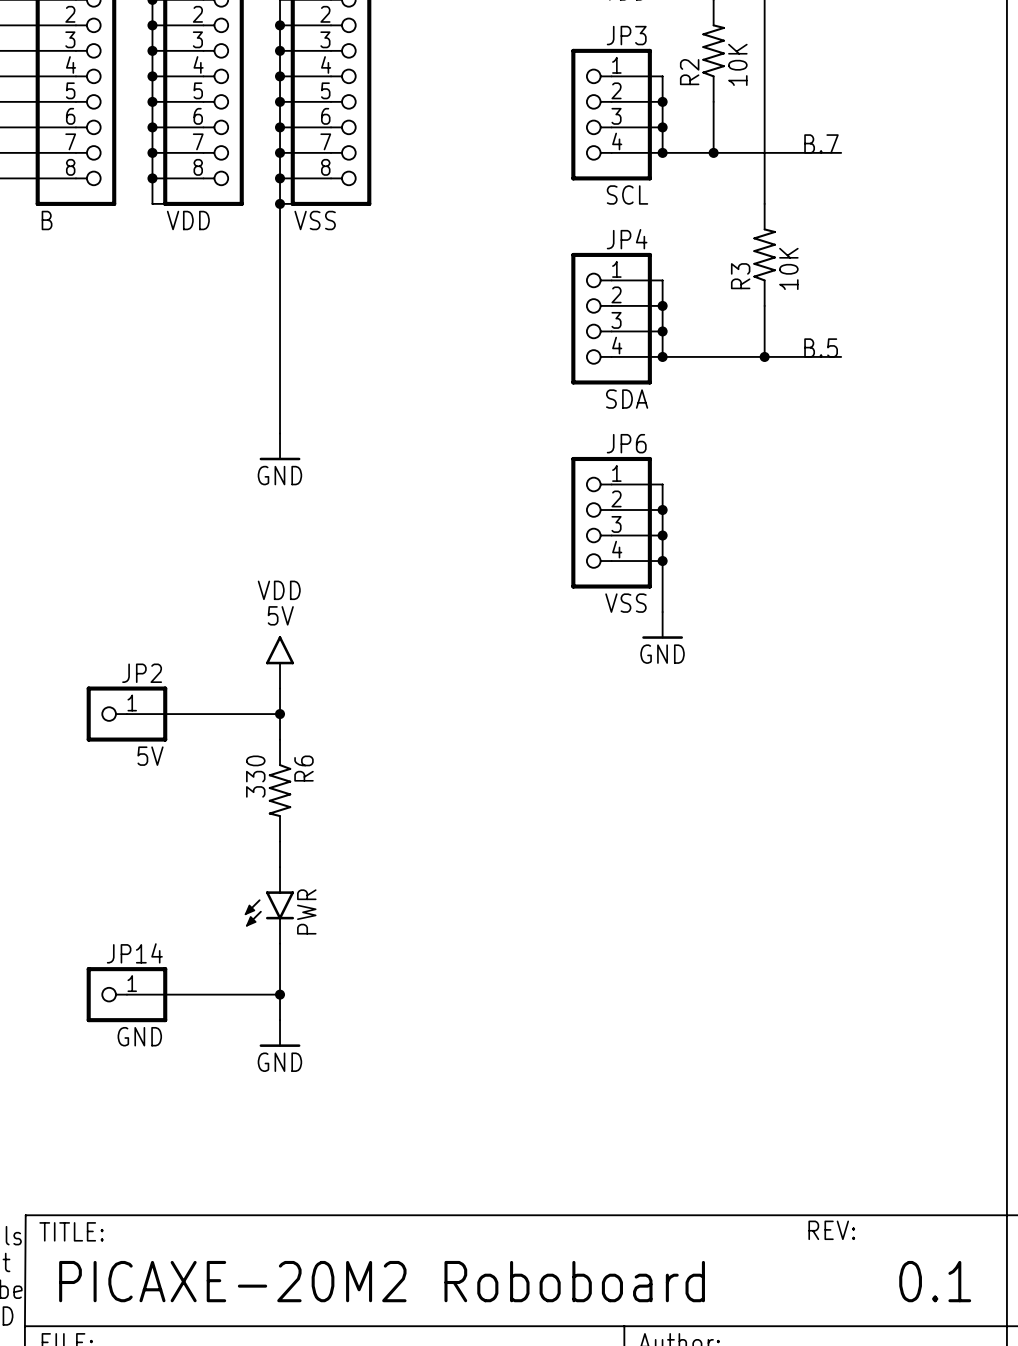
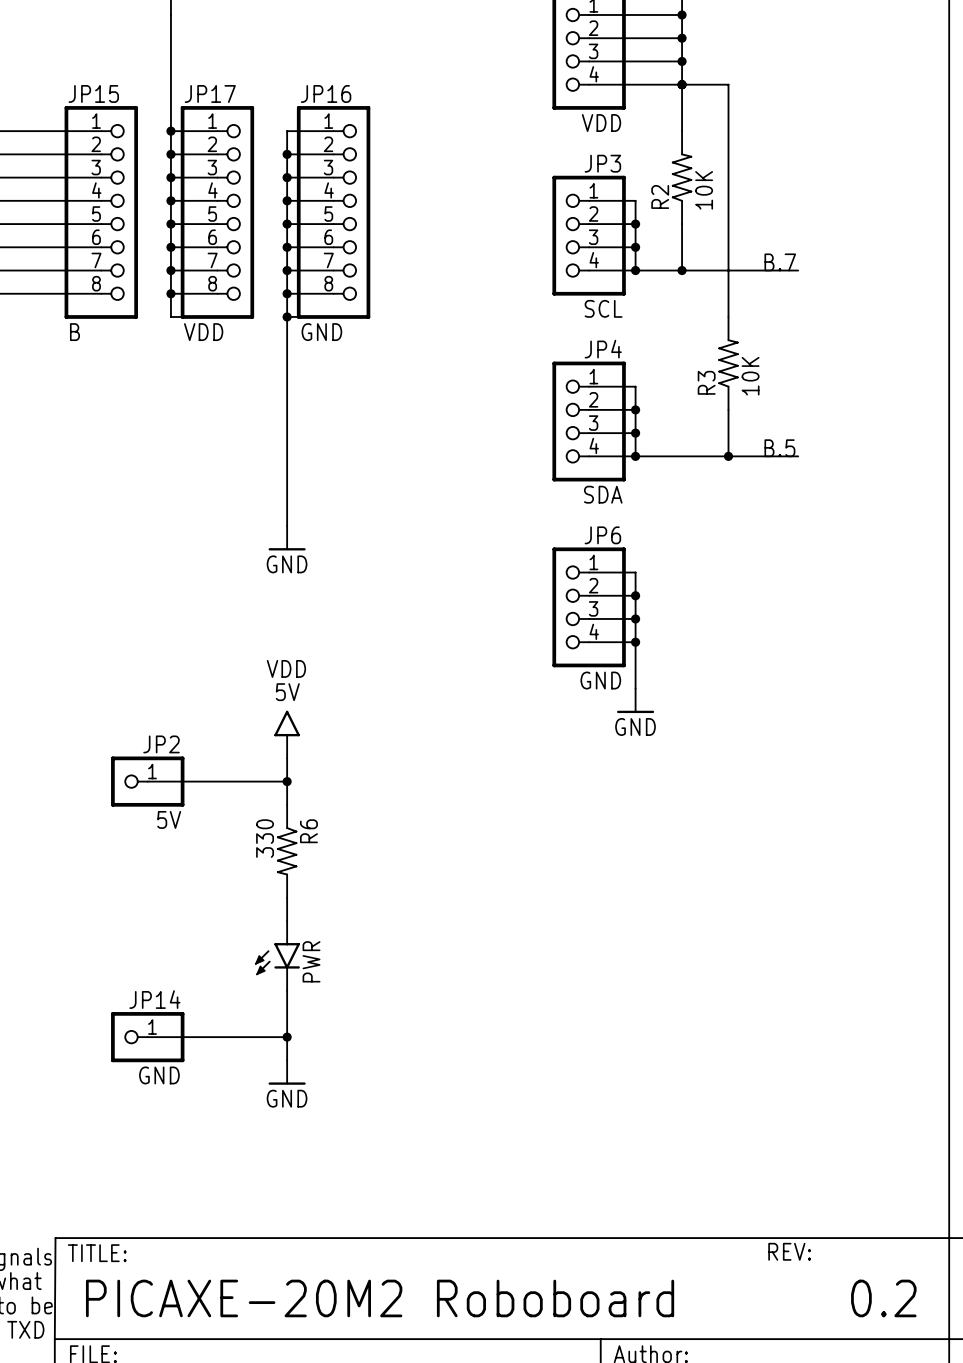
JP16 value: VSS (315, 220) -> GND (321, 332)
JP6 value: VSS (625, 603) -> GND (600, 680)
text: 0.1 (935, 1281) -> 0.2 (883, 1298)

